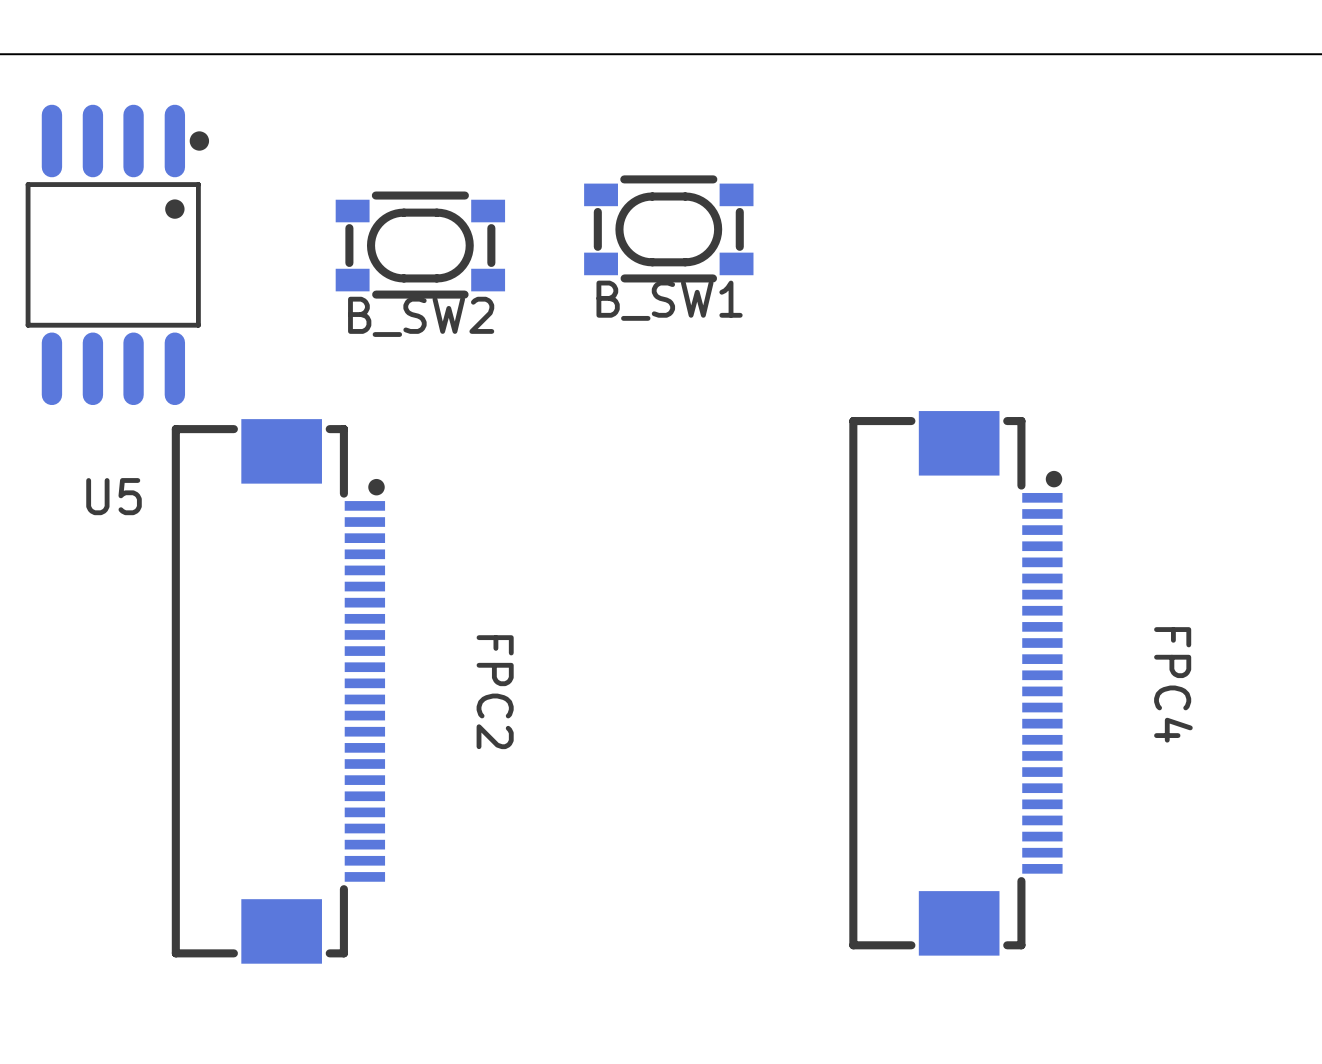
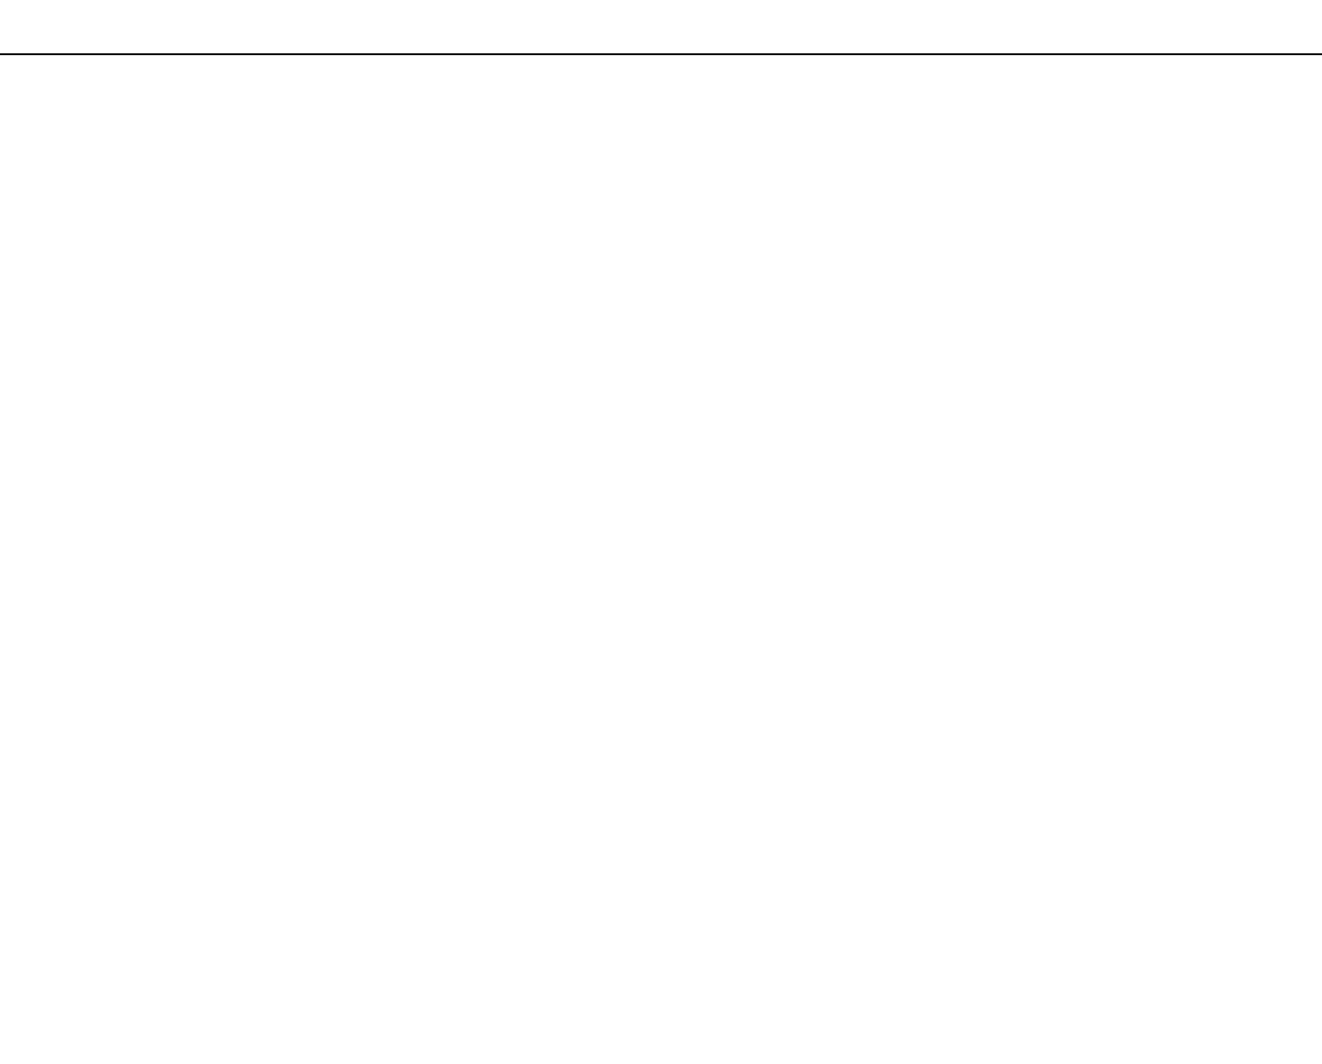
B_SW1: (668, 228) -> none
B_SW2: (420, 245) -> none
U5: (117, 254) -> none
FPC4: (955, 683) -> none
FPC2: (278, 691) -> none

